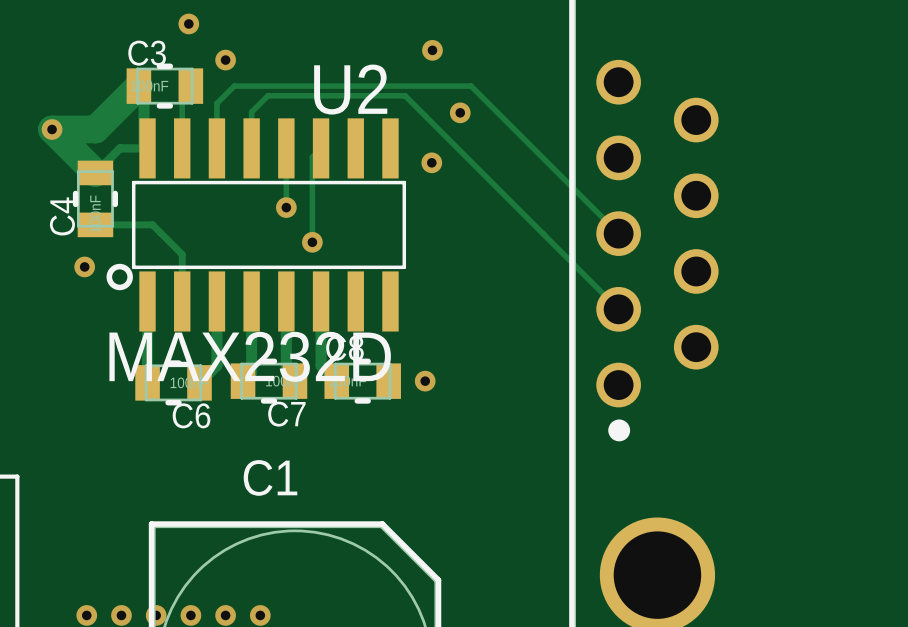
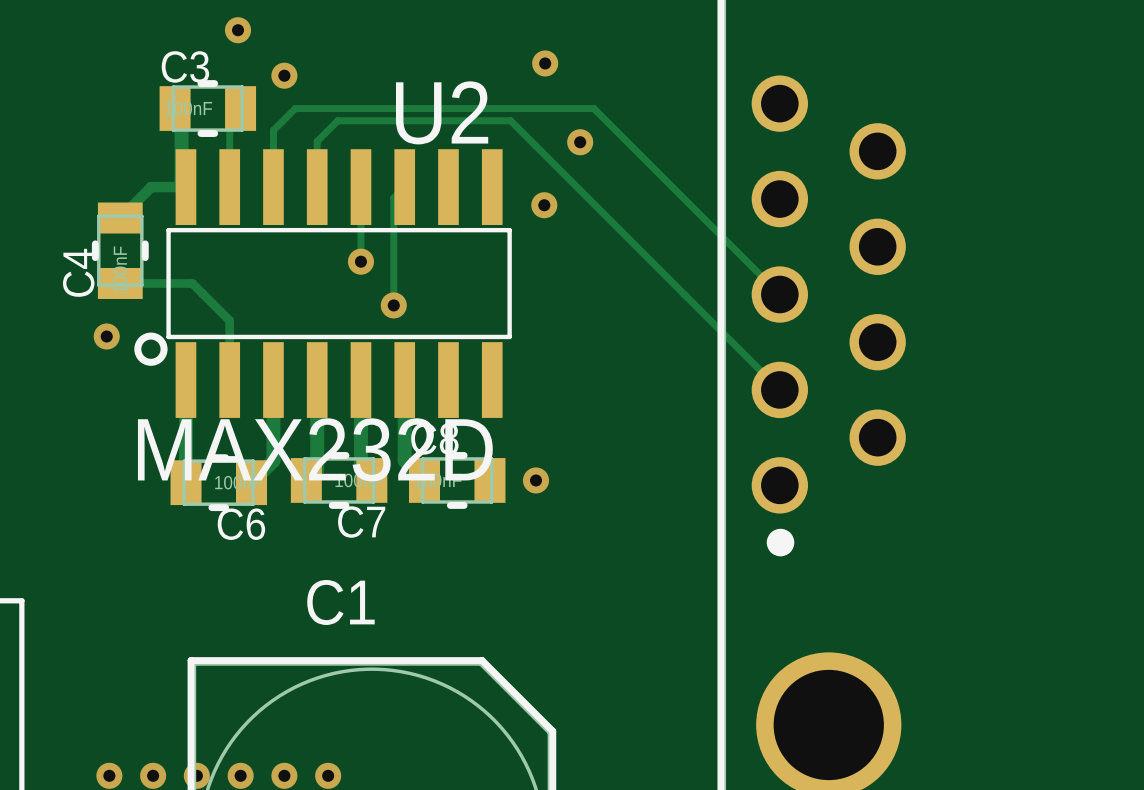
track: (138, 86) (95, 129) (52, 129) (95, 172) -> none
via: (52, 129) -> none

